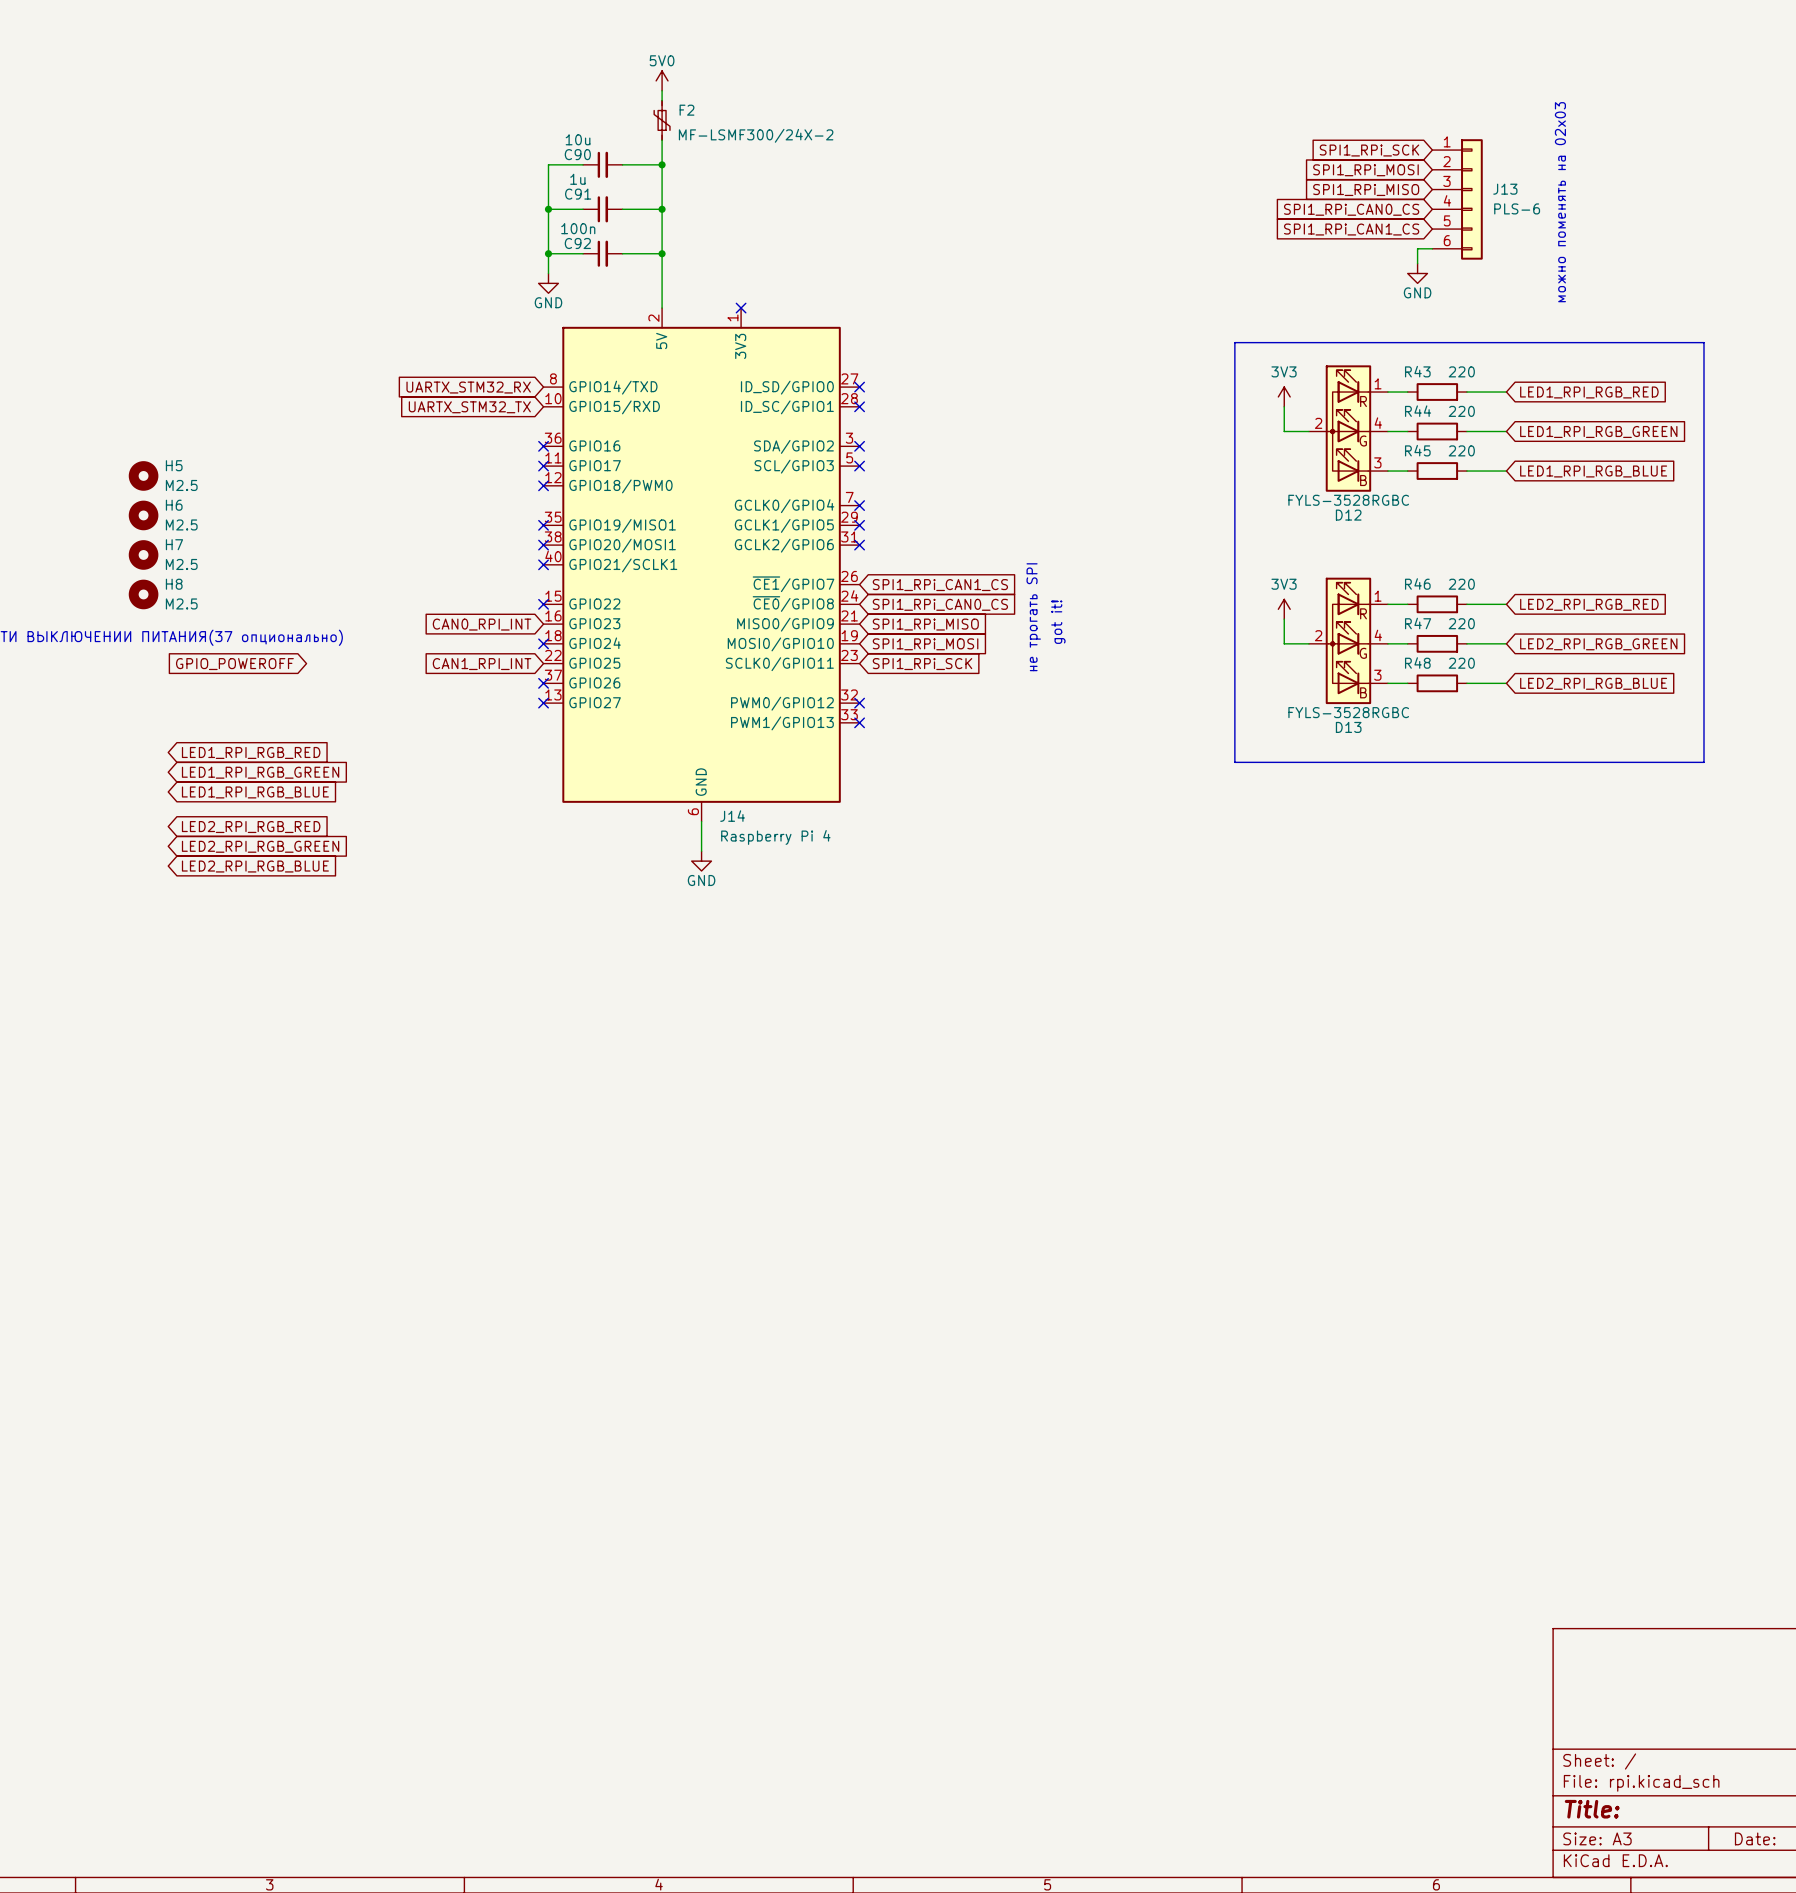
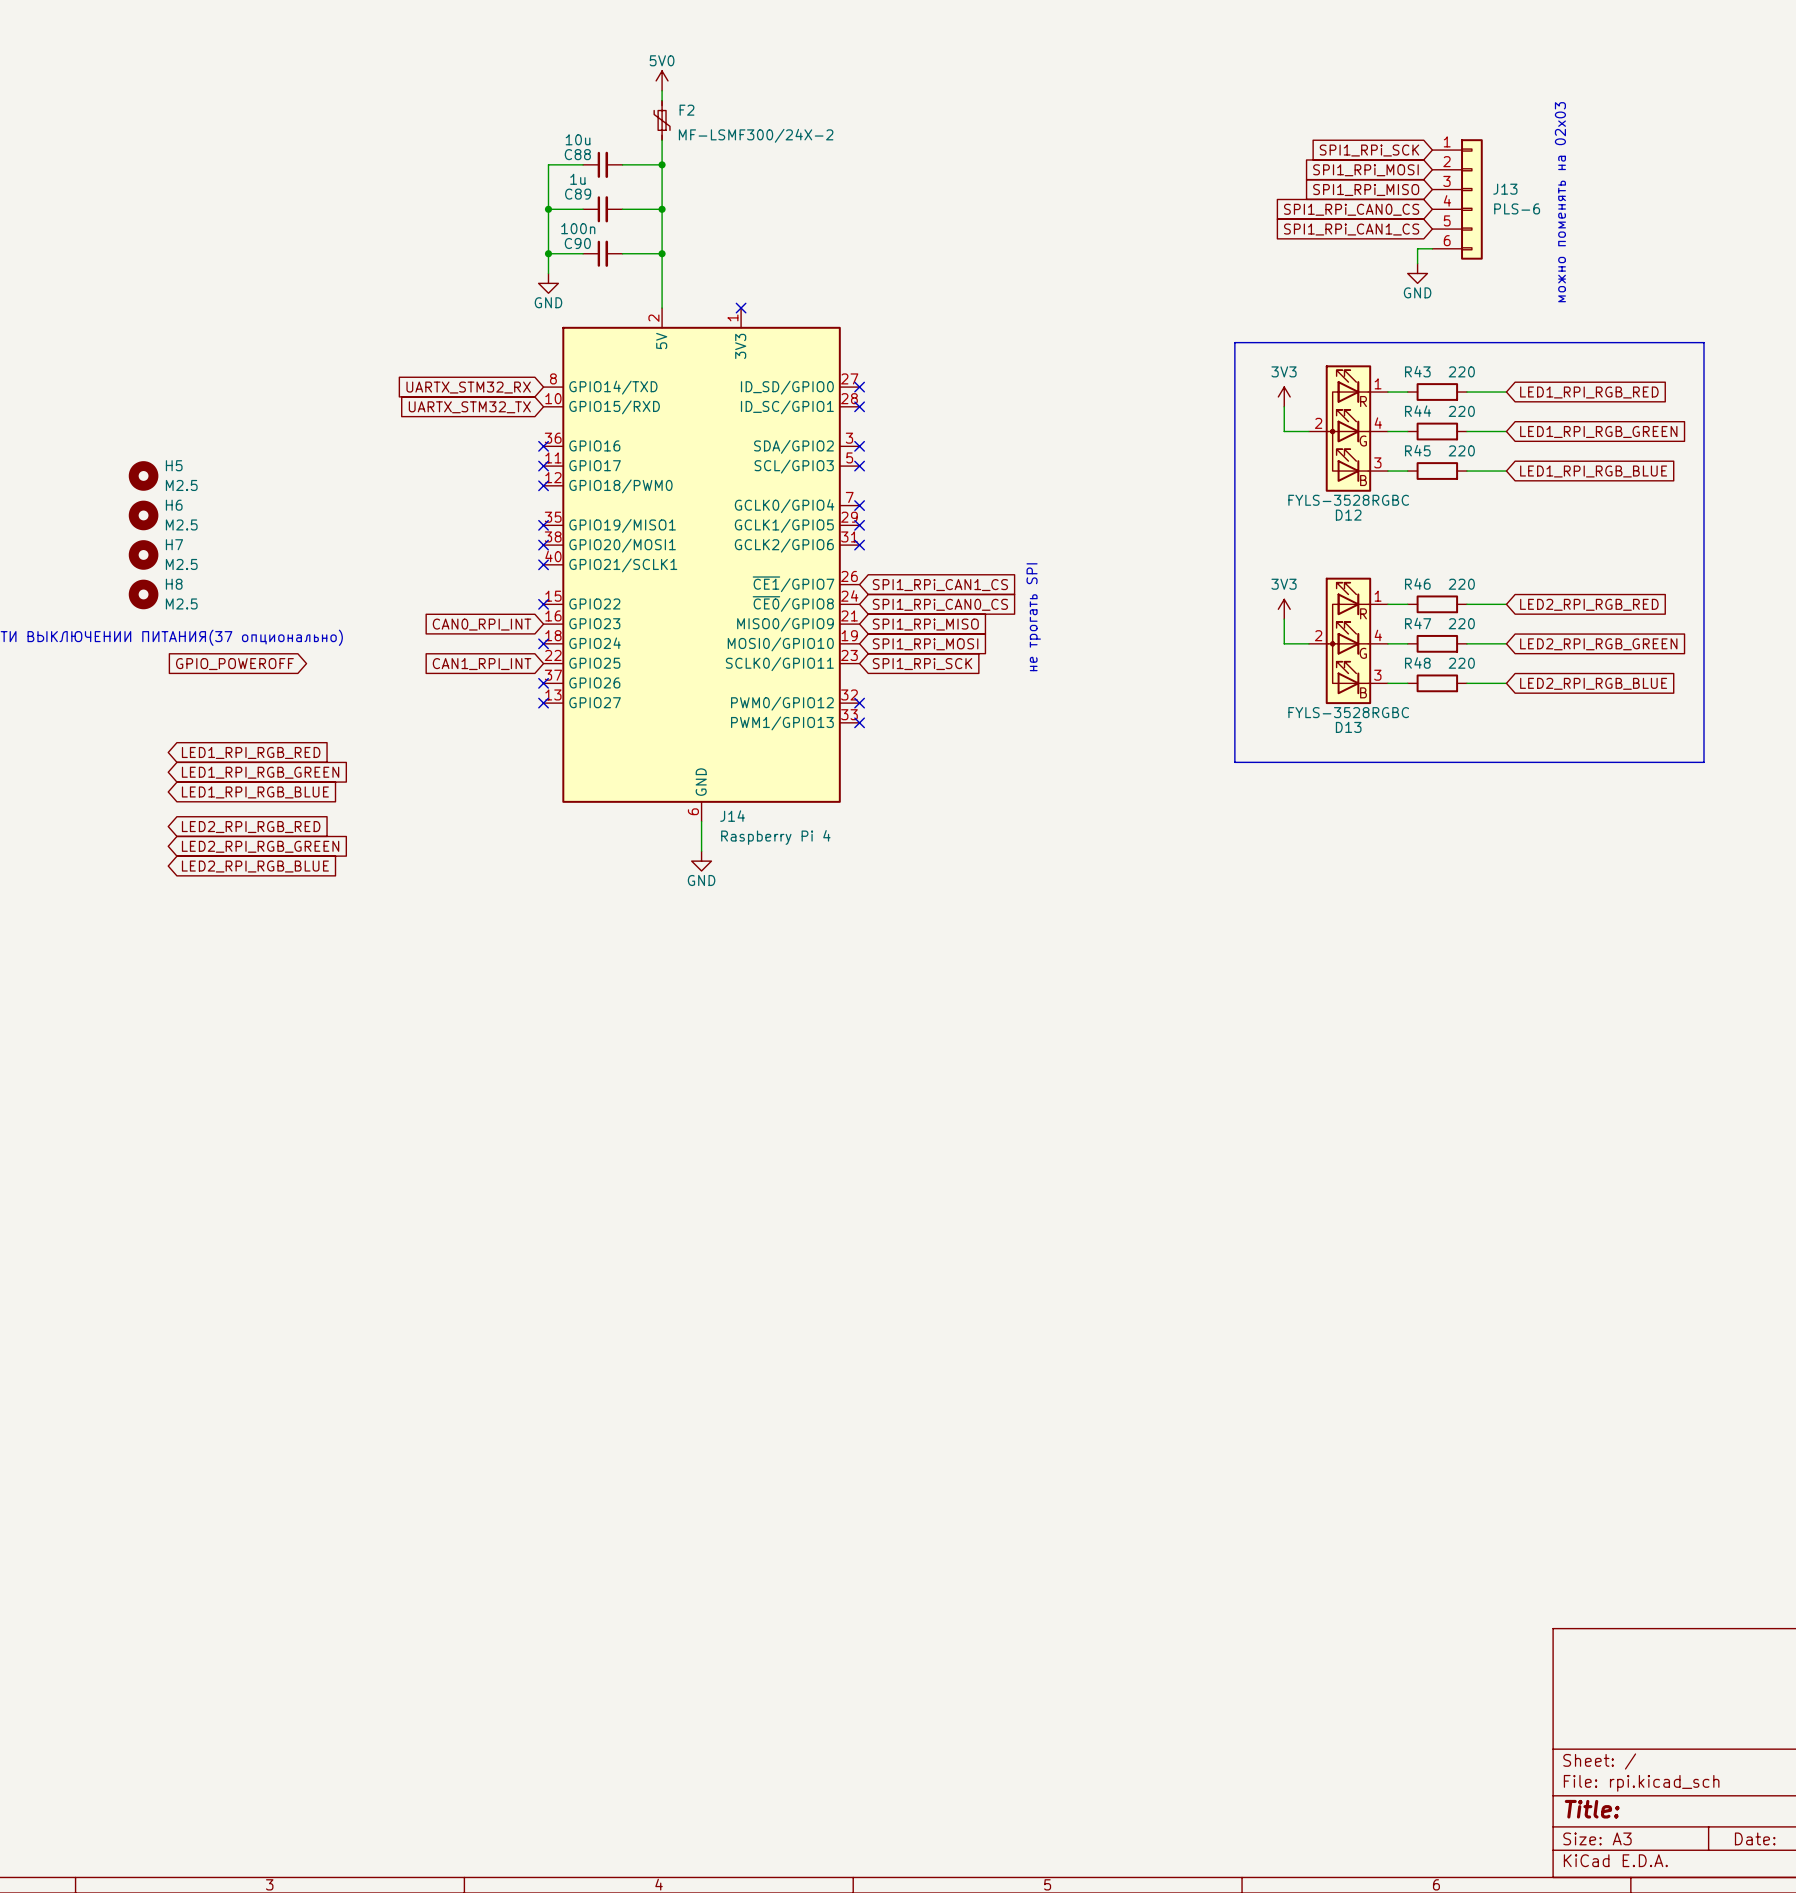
C90 name: C90 (577, 154) -> C88 (577, 154)
C91 name: C91 (578, 194) -> C89 (578, 194)
C92 name: C92 (577, 243) -> C90 (577, 243)
text: got it! (1058, 622) -> none

